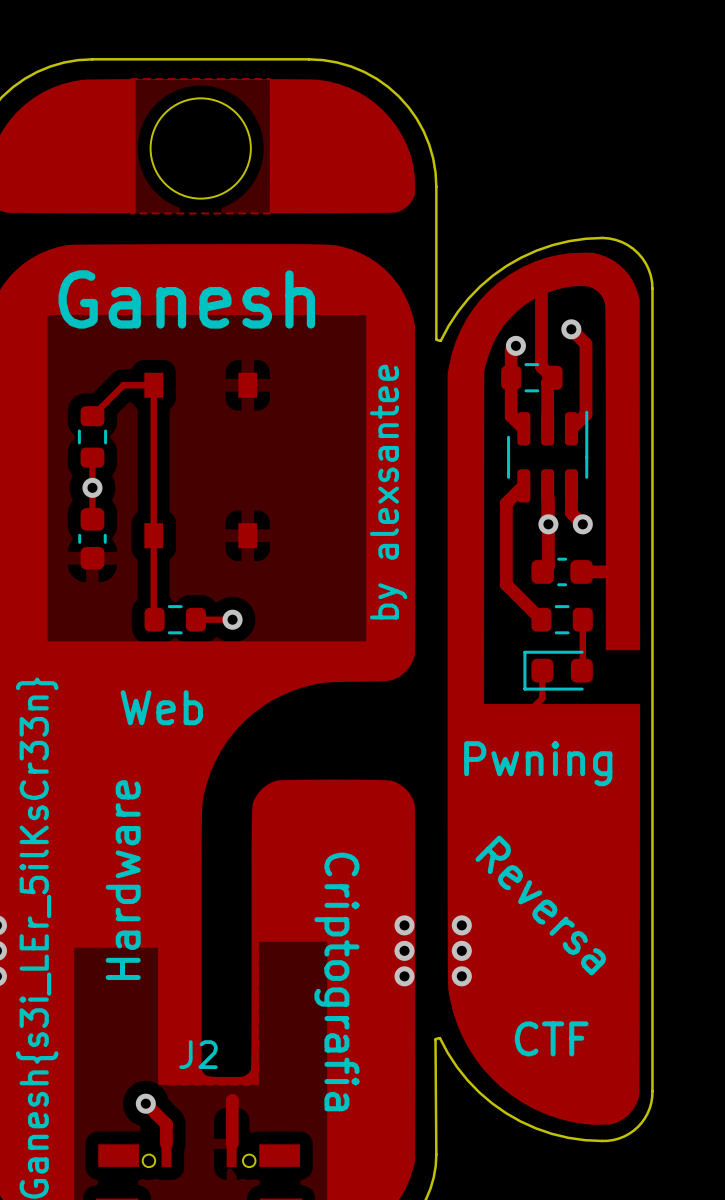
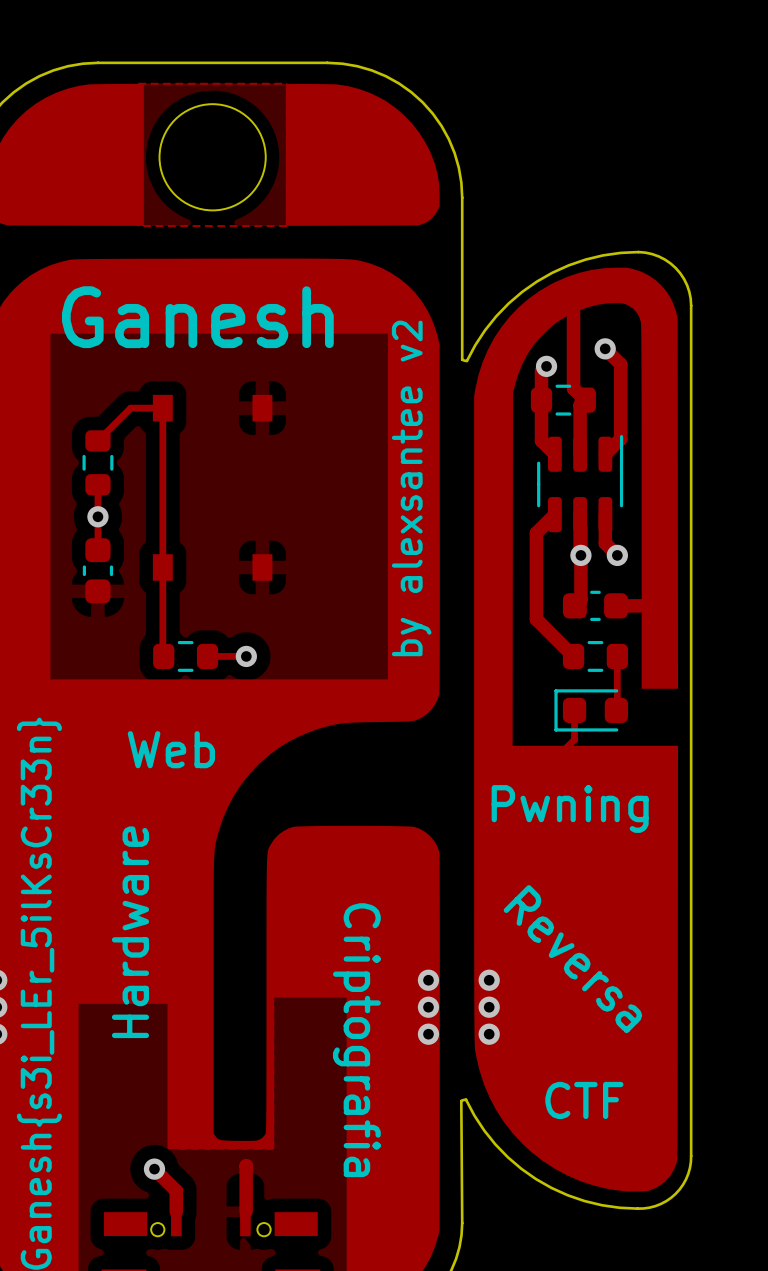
text: by alexsantee (388, 492) -> by alexsantee v2 (411, 488)
J2 name: J2 (198, 1054) -> none

